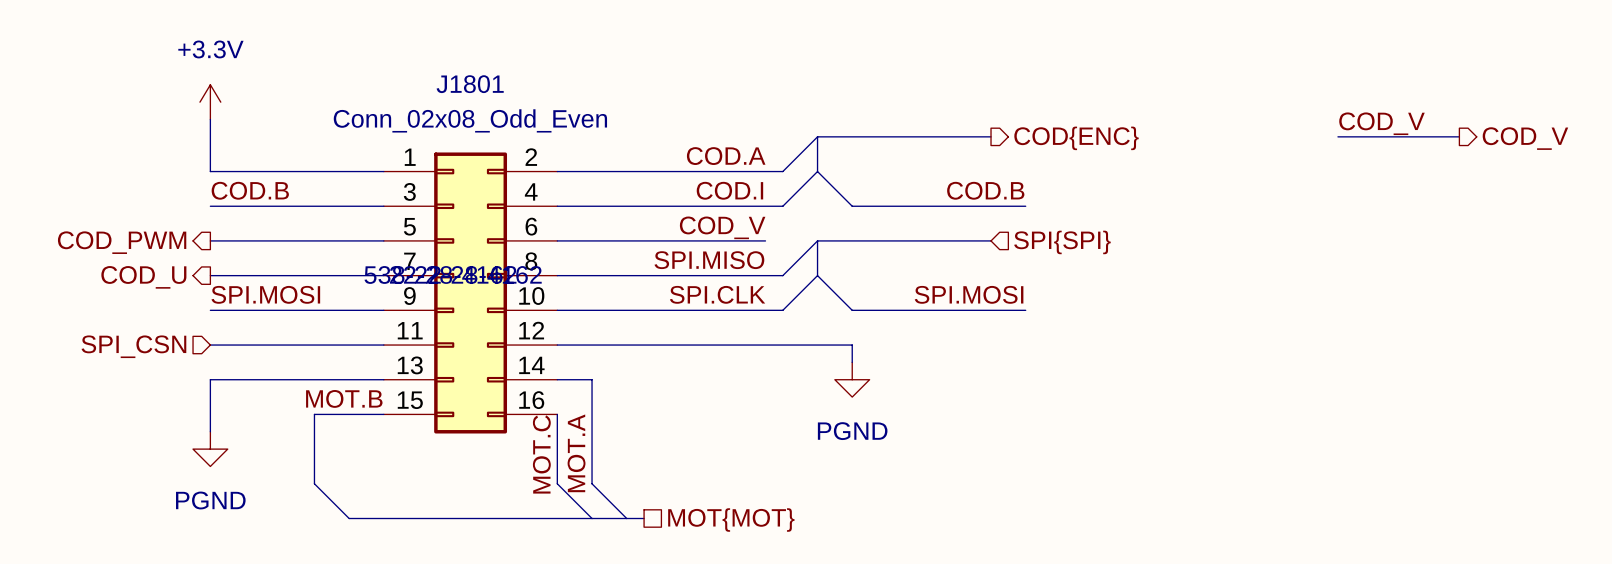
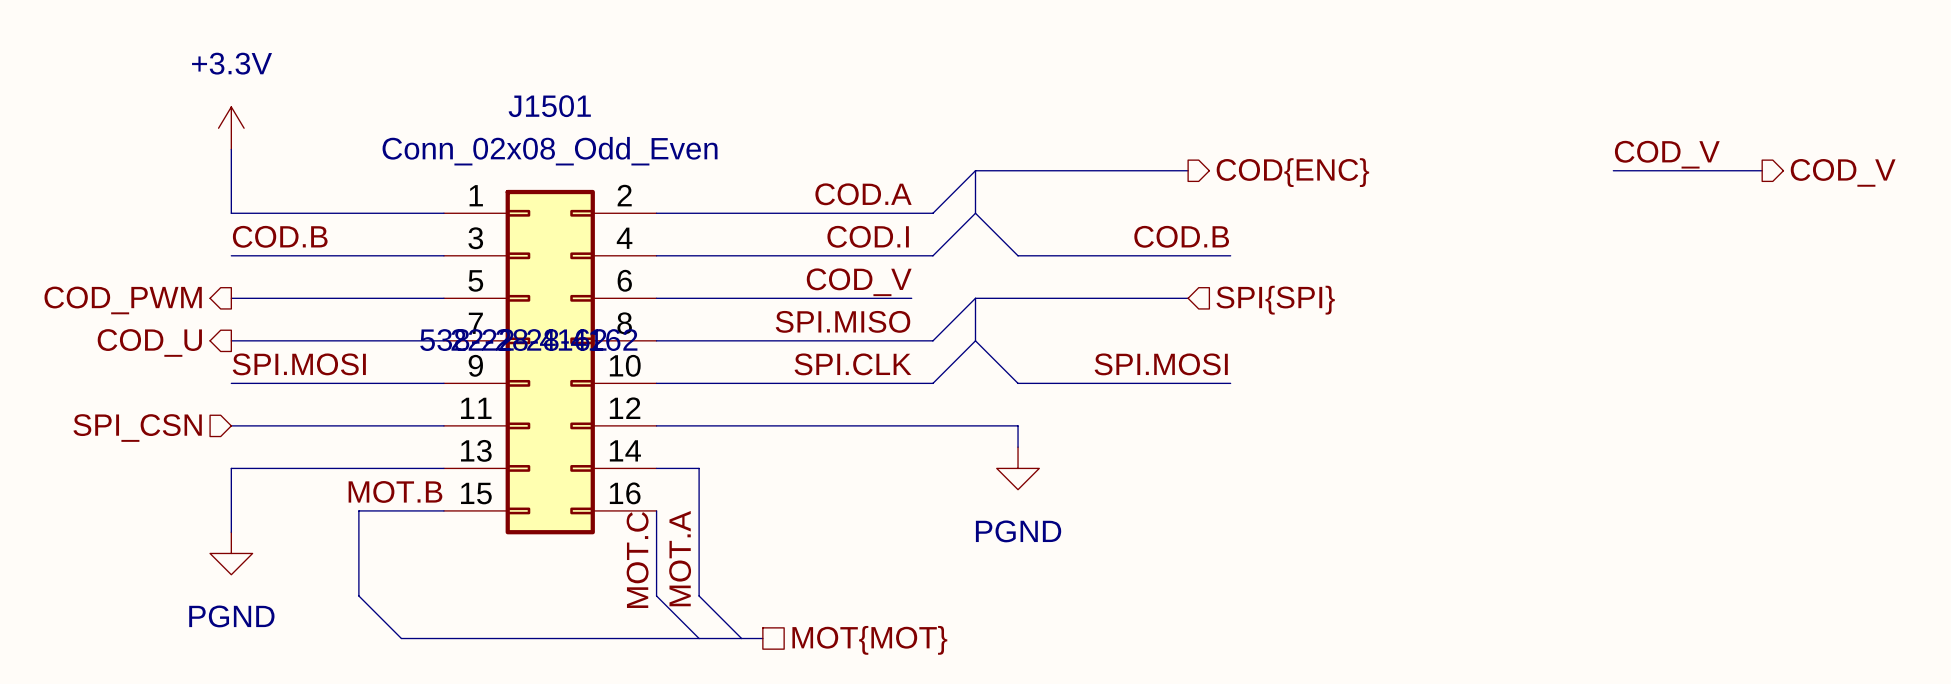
J1801 name: J1801 (470, 84) -> J1501 (549, 106)

